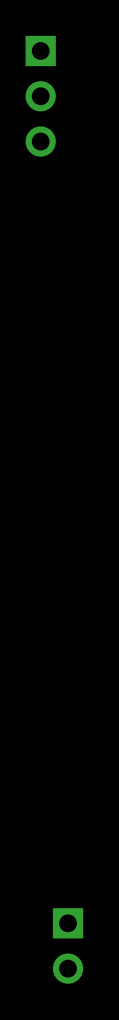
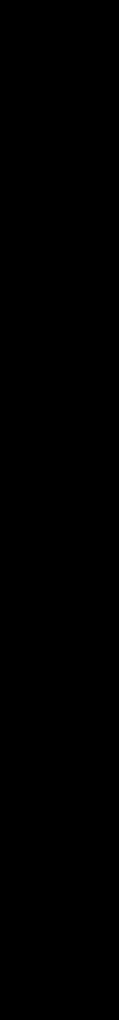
part: (40, 96) -> none
part: (68, 945) -> none

